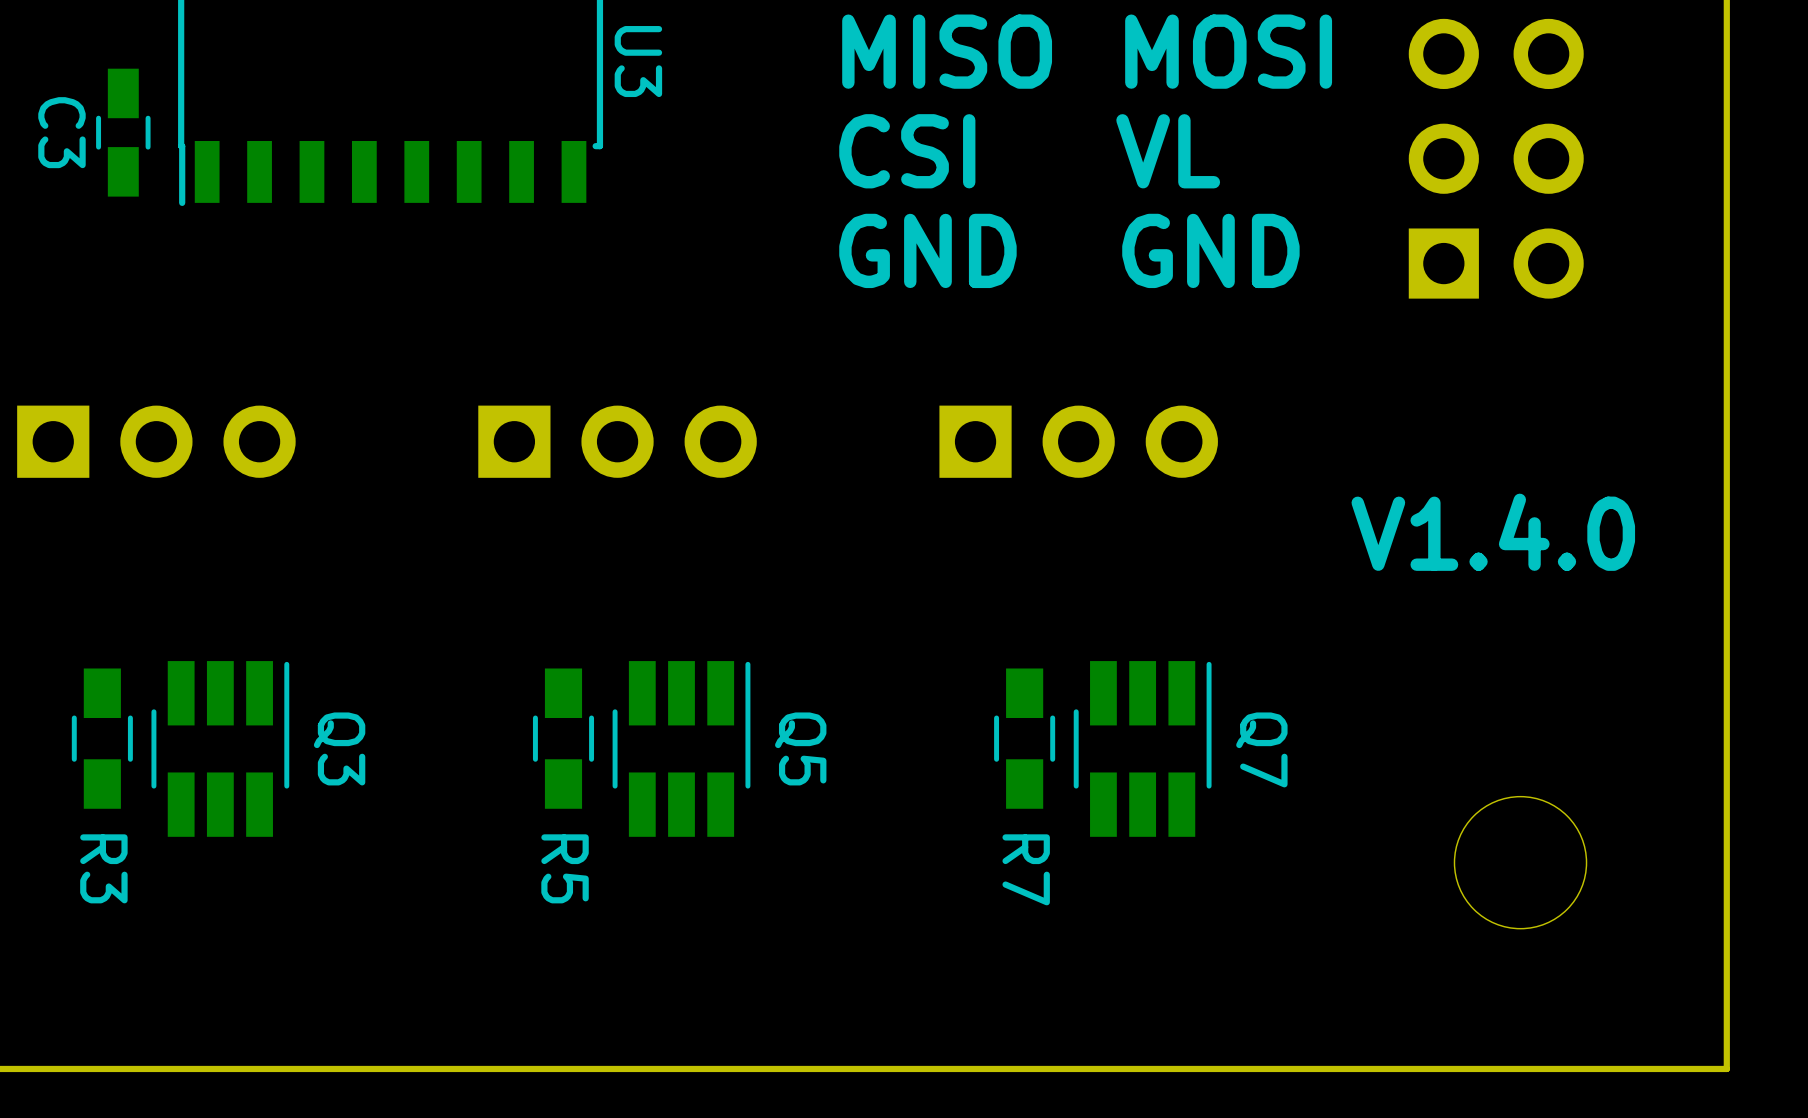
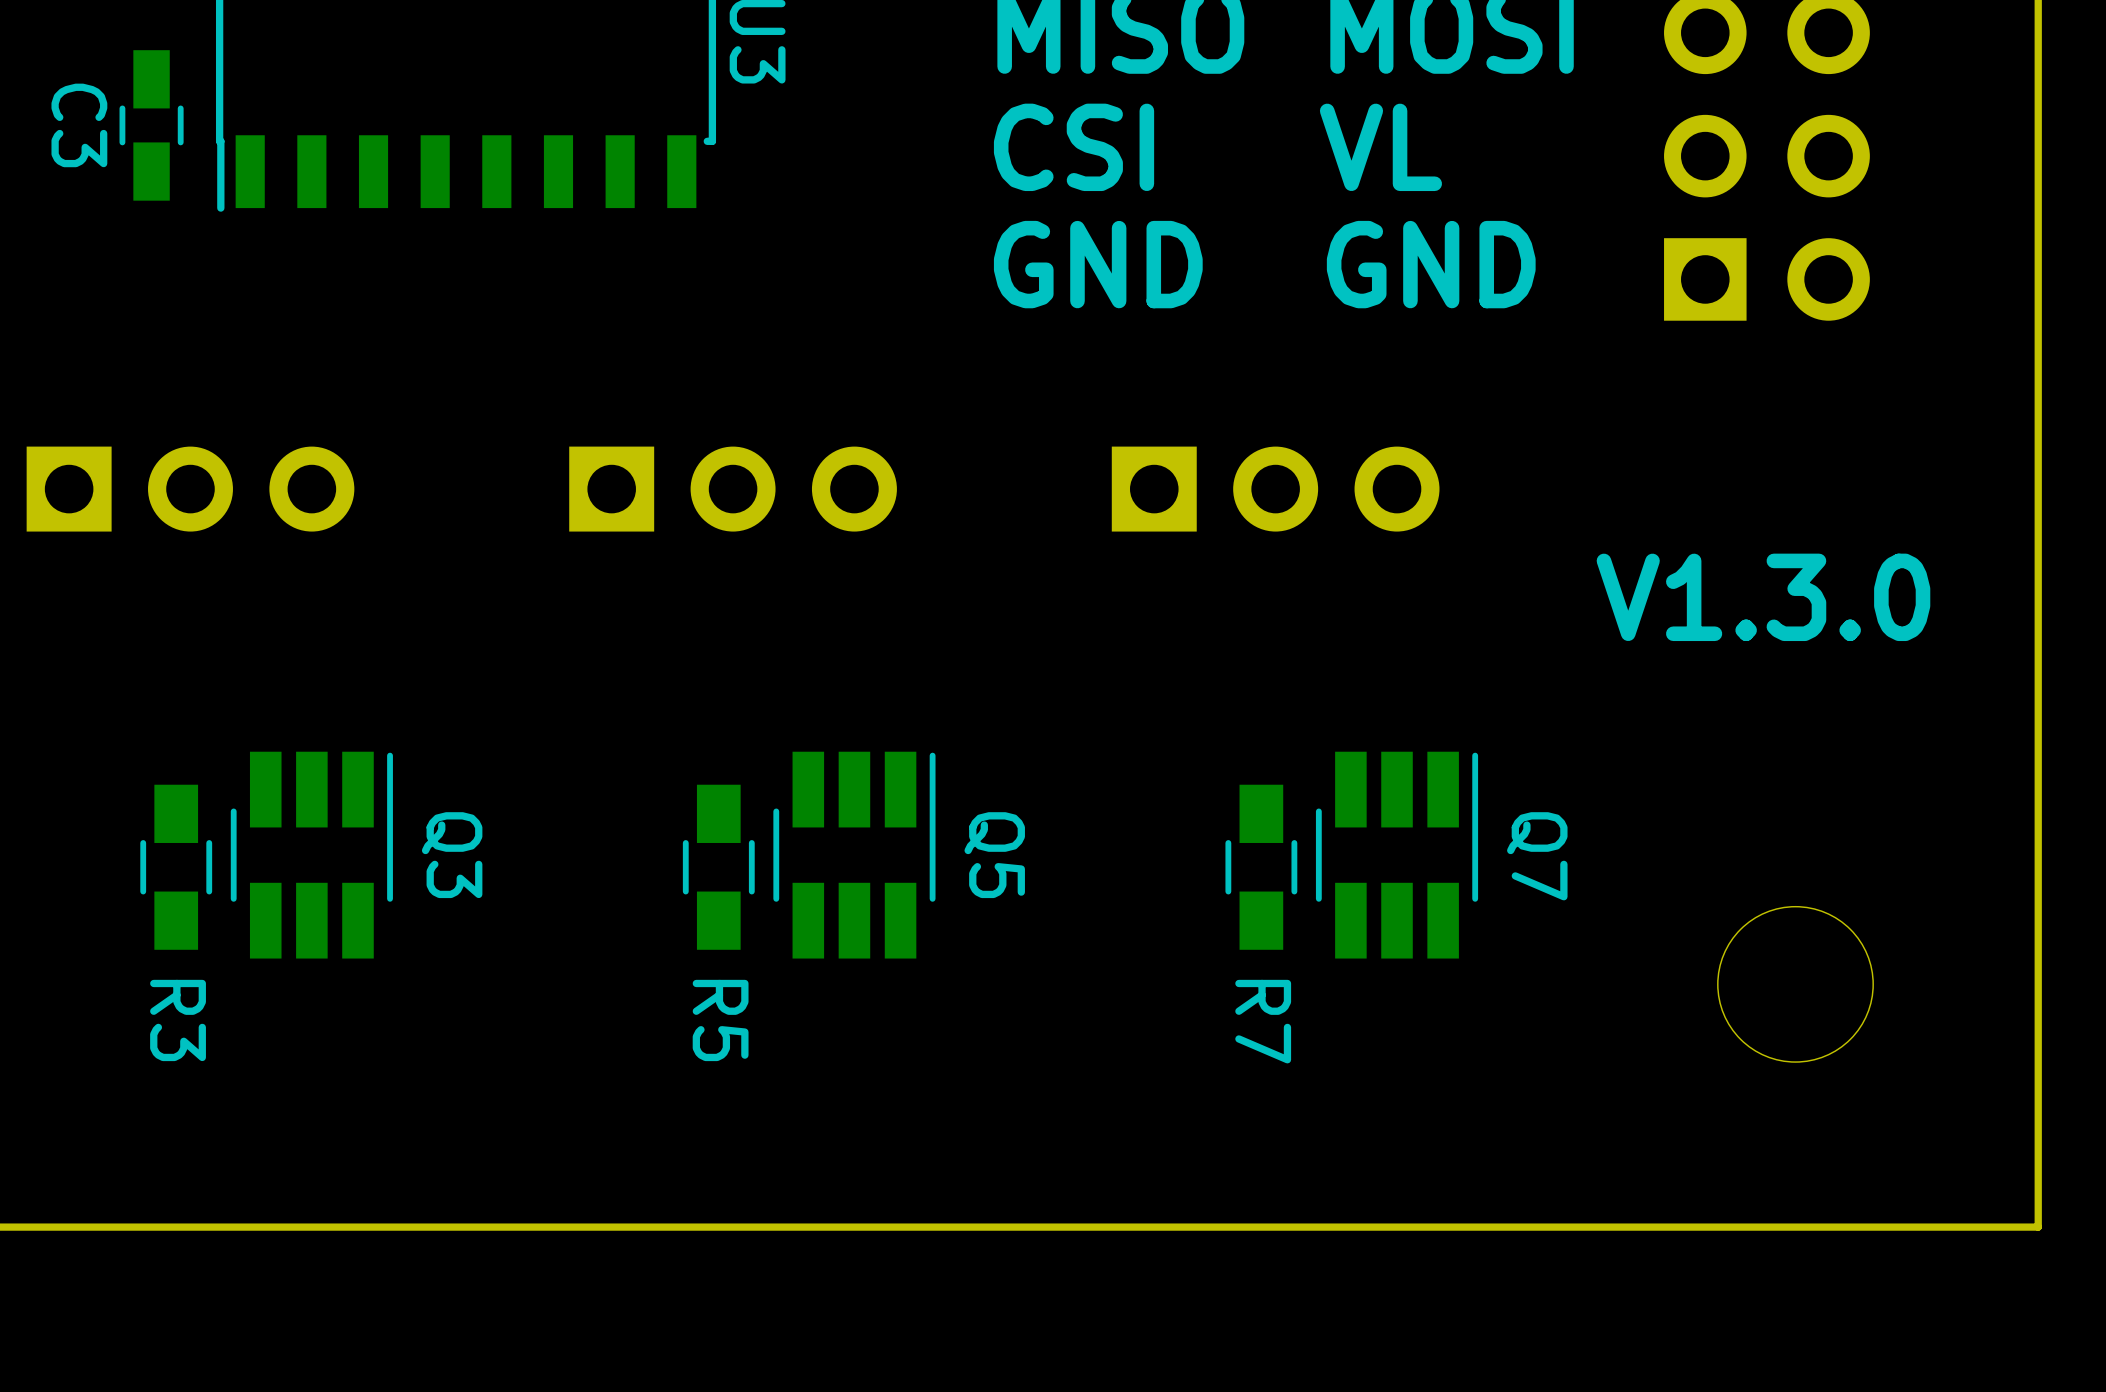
text: V1.4.0 (1493, 532) -> V1.3.0 (1763, 597)
R3 position: (102, 738) -> (176, 867)
R5 position: (563, 738) -> (718, 867)
R7 position: (1024, 738) -> (1261, 867)
Q3 position: (220, 748) -> (311, 855)
Q5 position: (681, 748) -> (854, 855)
Q7 position: (1142, 748) -> (1397, 855)

